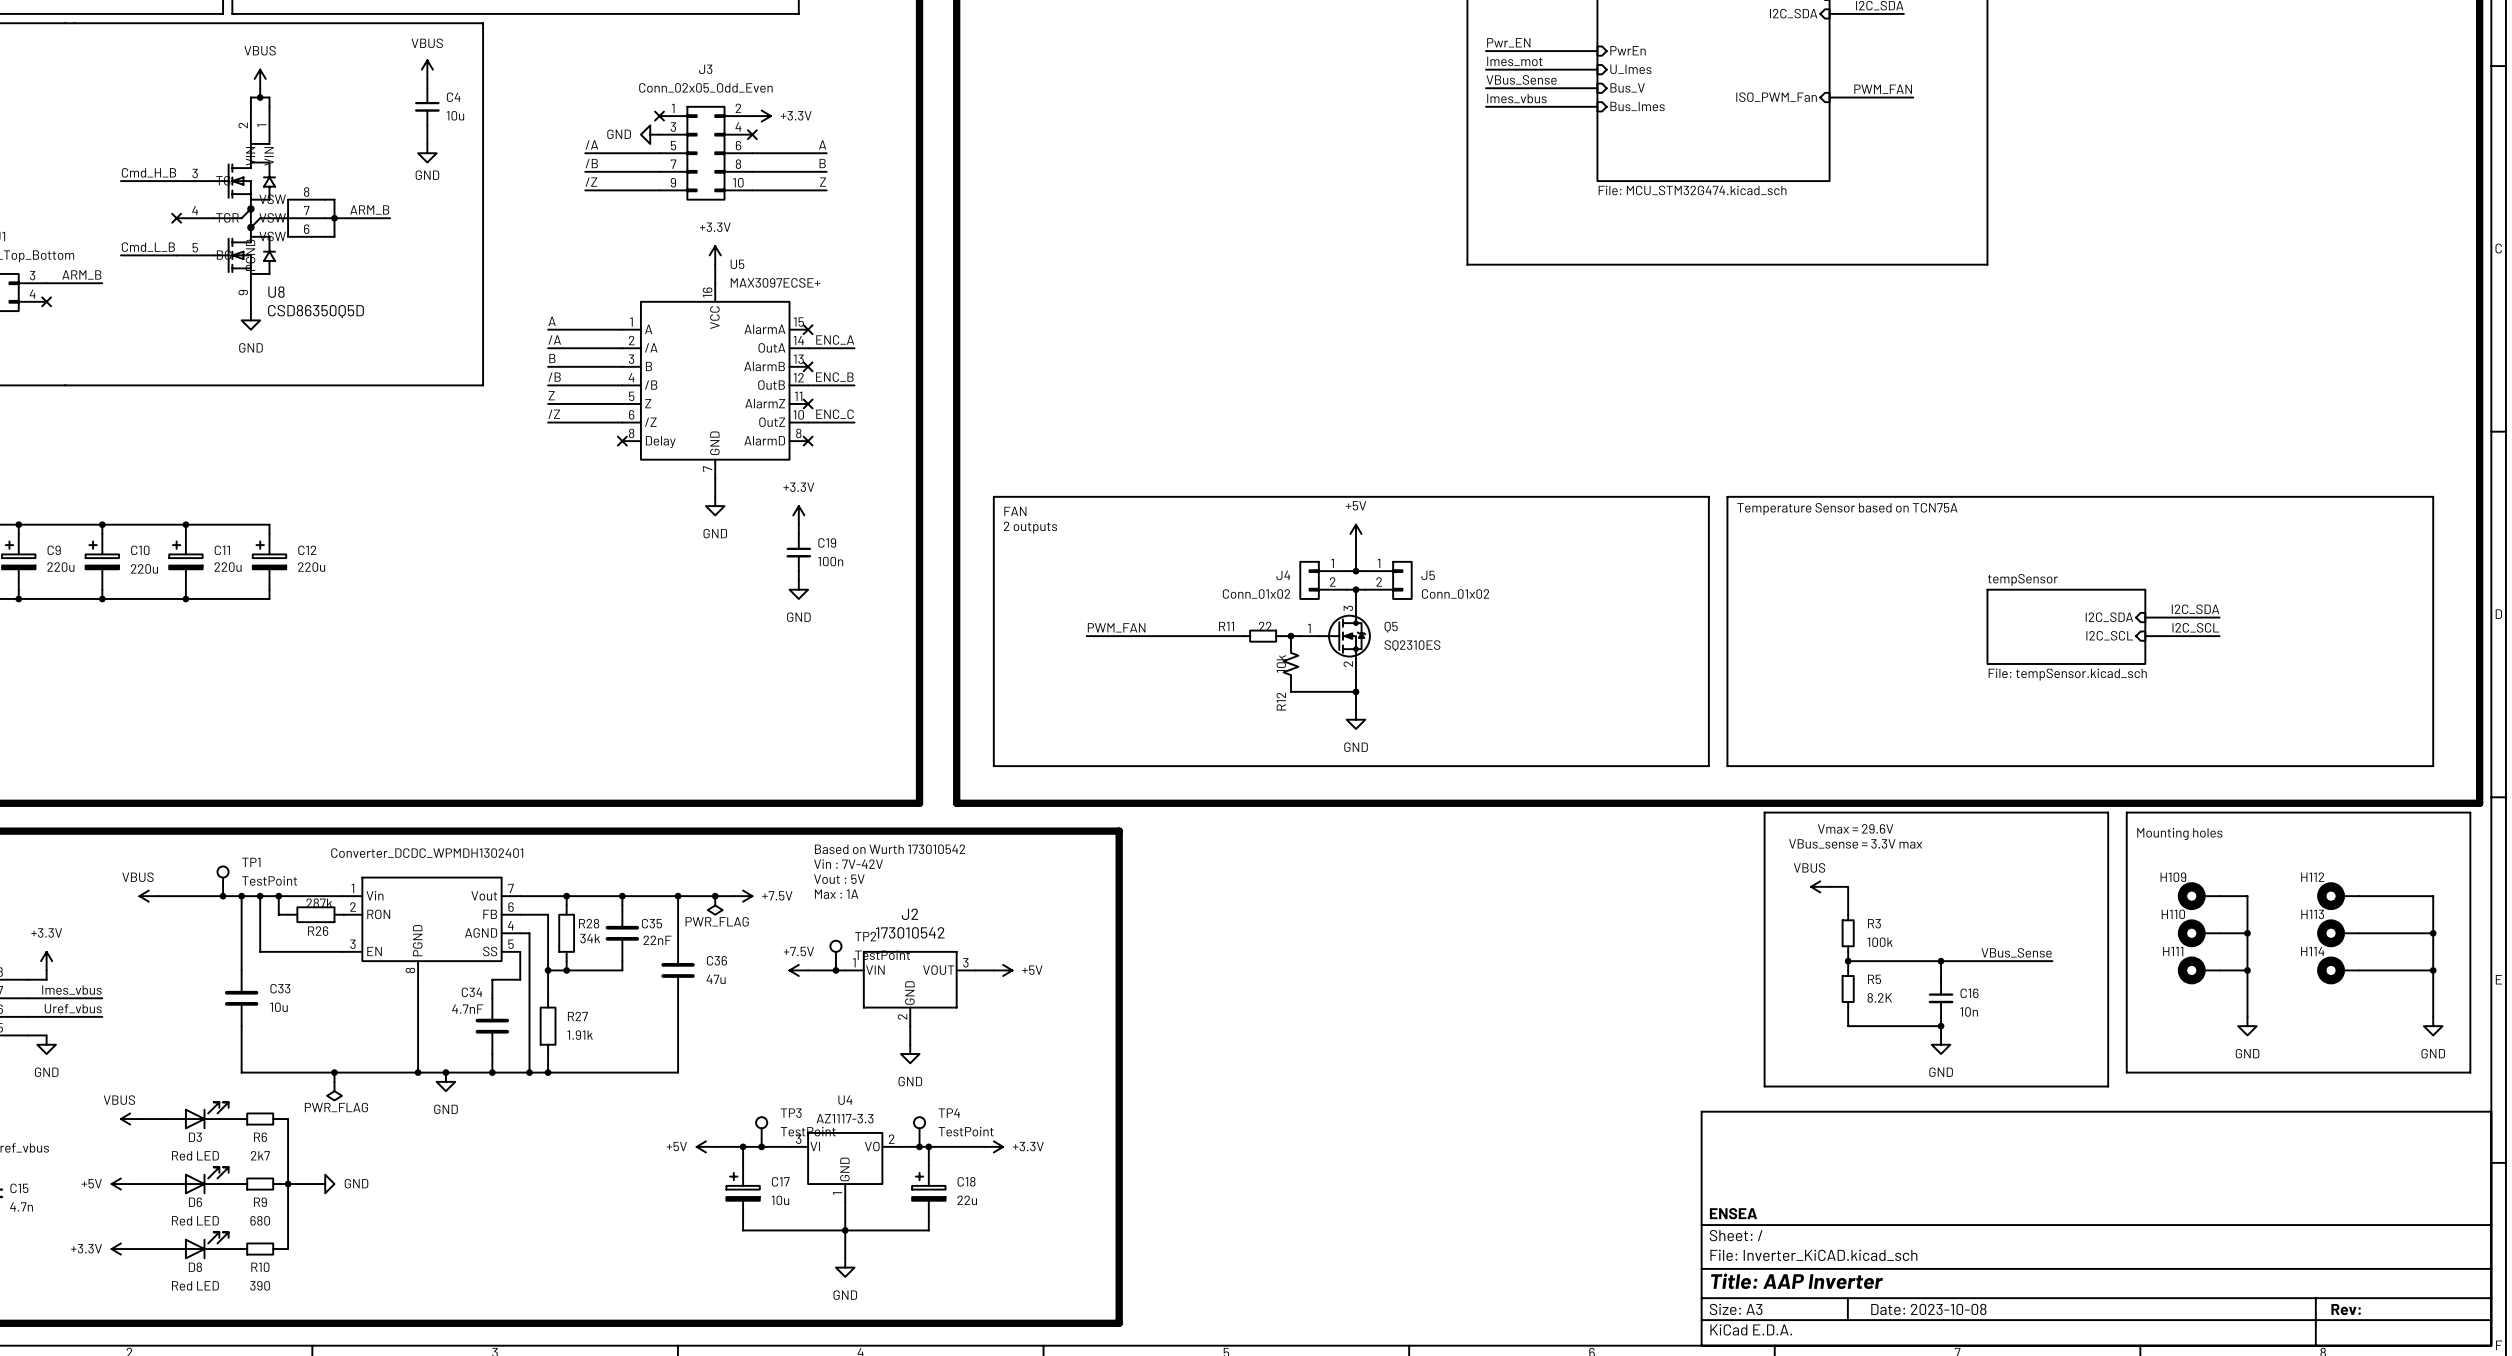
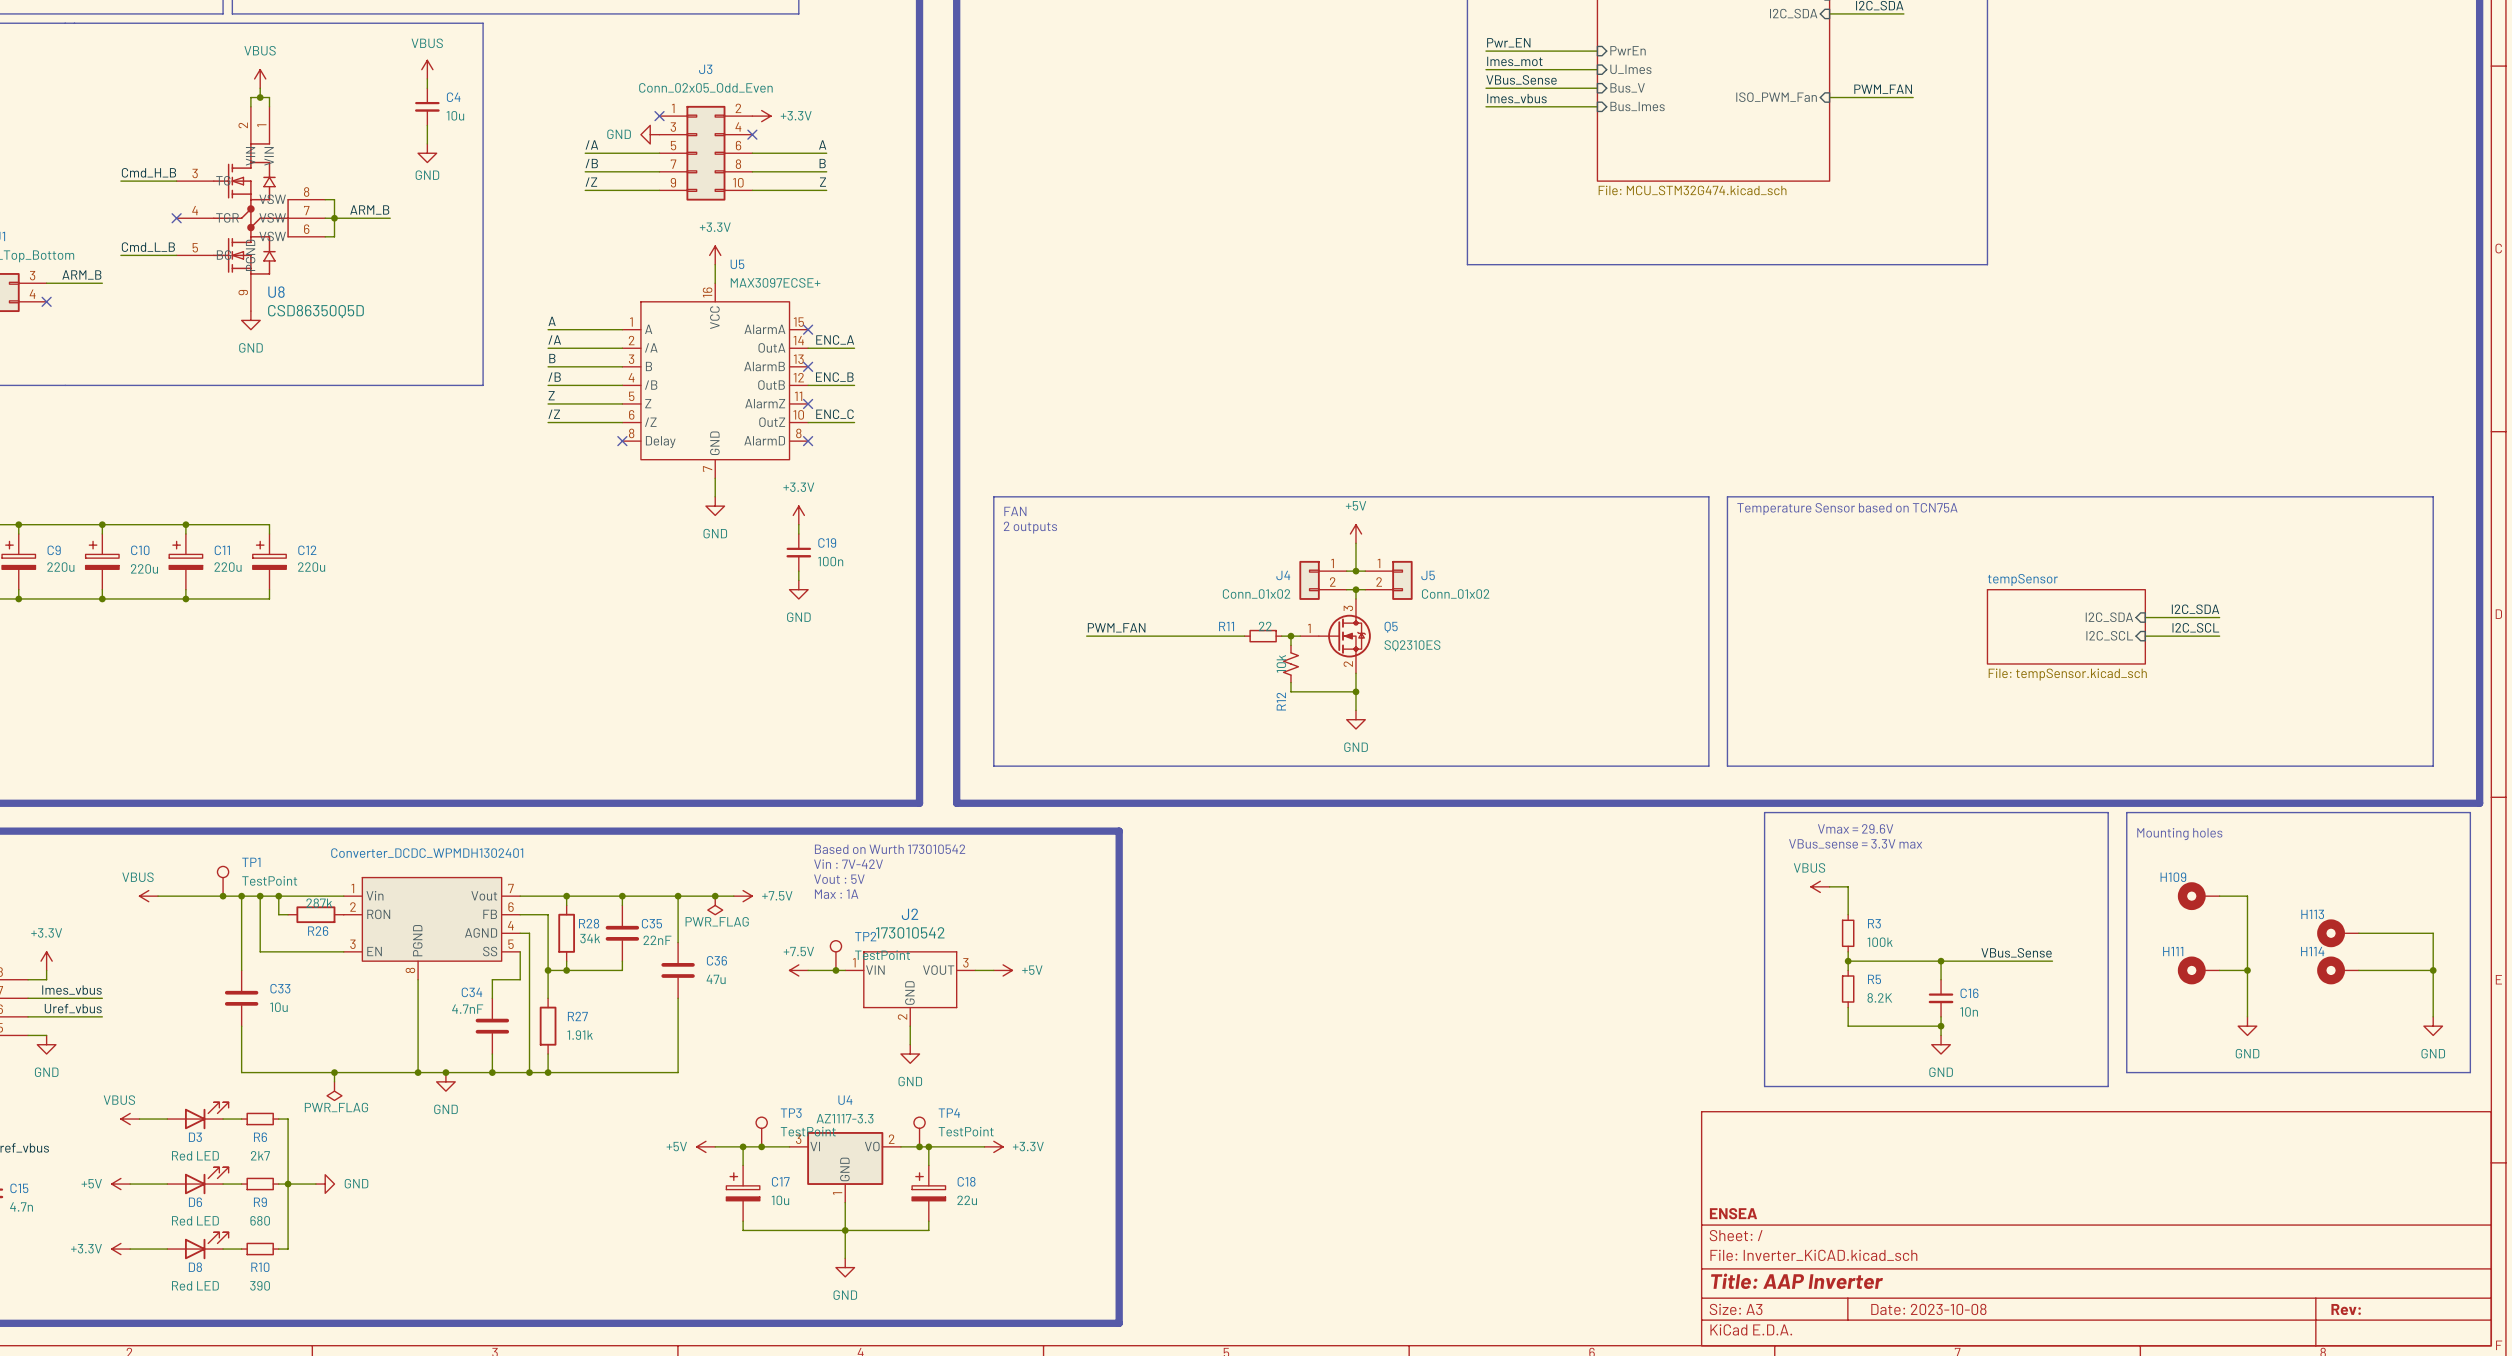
H112: (2338, 896) -> none
wire: (2358, 896) (2433, 896) (2433, 933) -> none
H110: (2198, 933) -> none
wire: (2219, 933) (2247, 933) -> none
junction: (2247, 933) -> none
junction: (2433, 933) -> none

